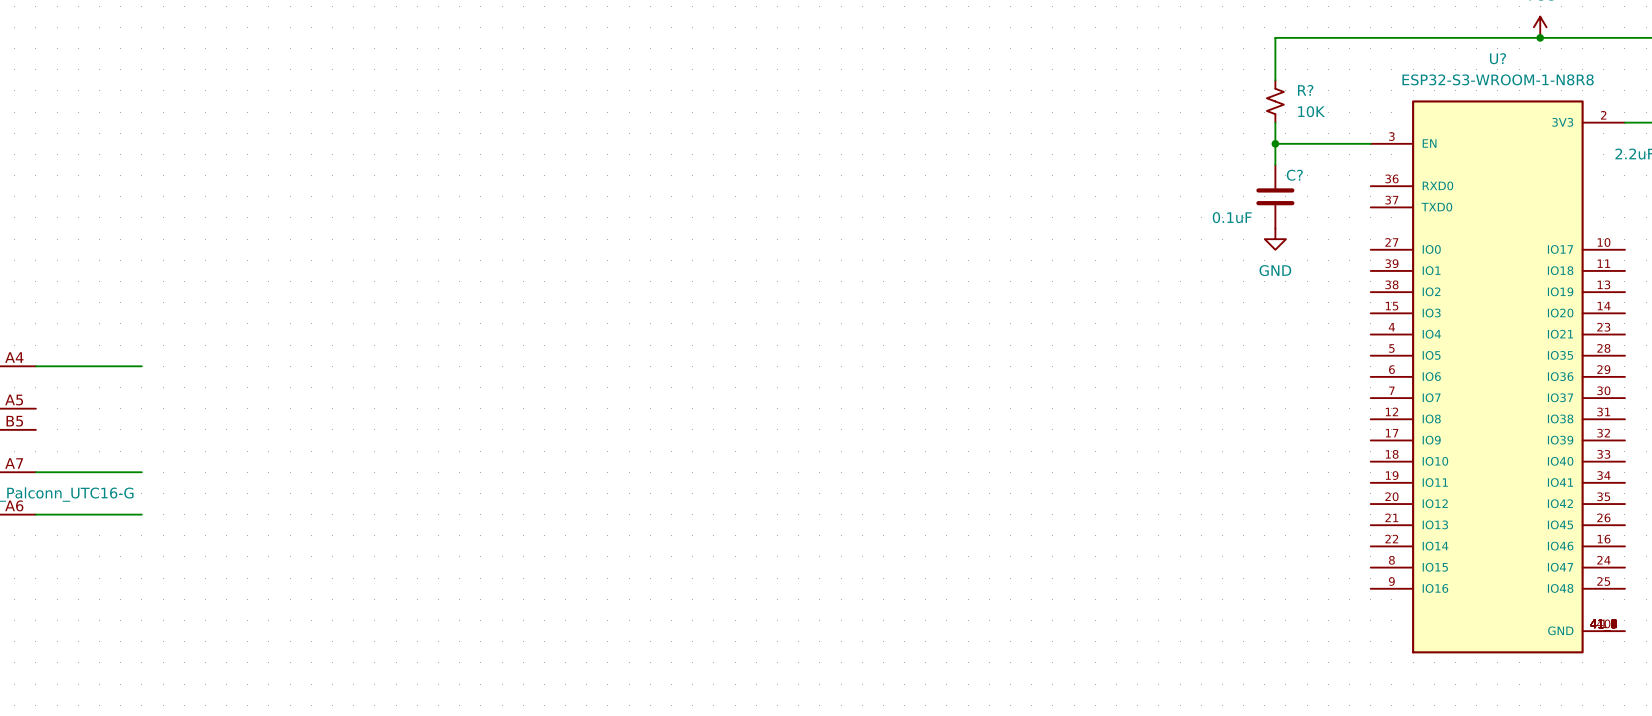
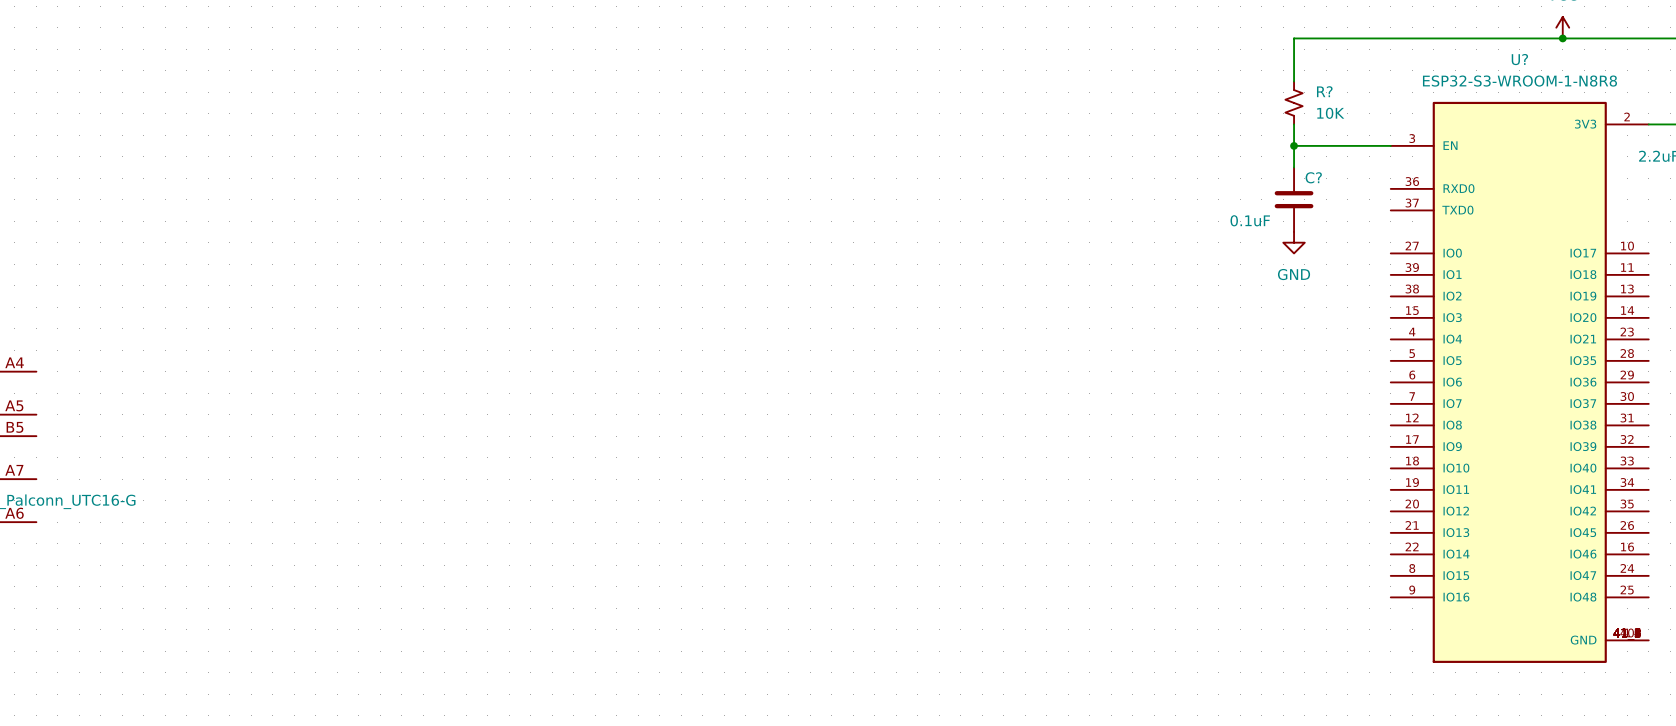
wire: (35, 366) (141, 366) -> none
wire: (35, 472) (141, 472) -> none
wire: (35, 514) (141, 514) -> none

